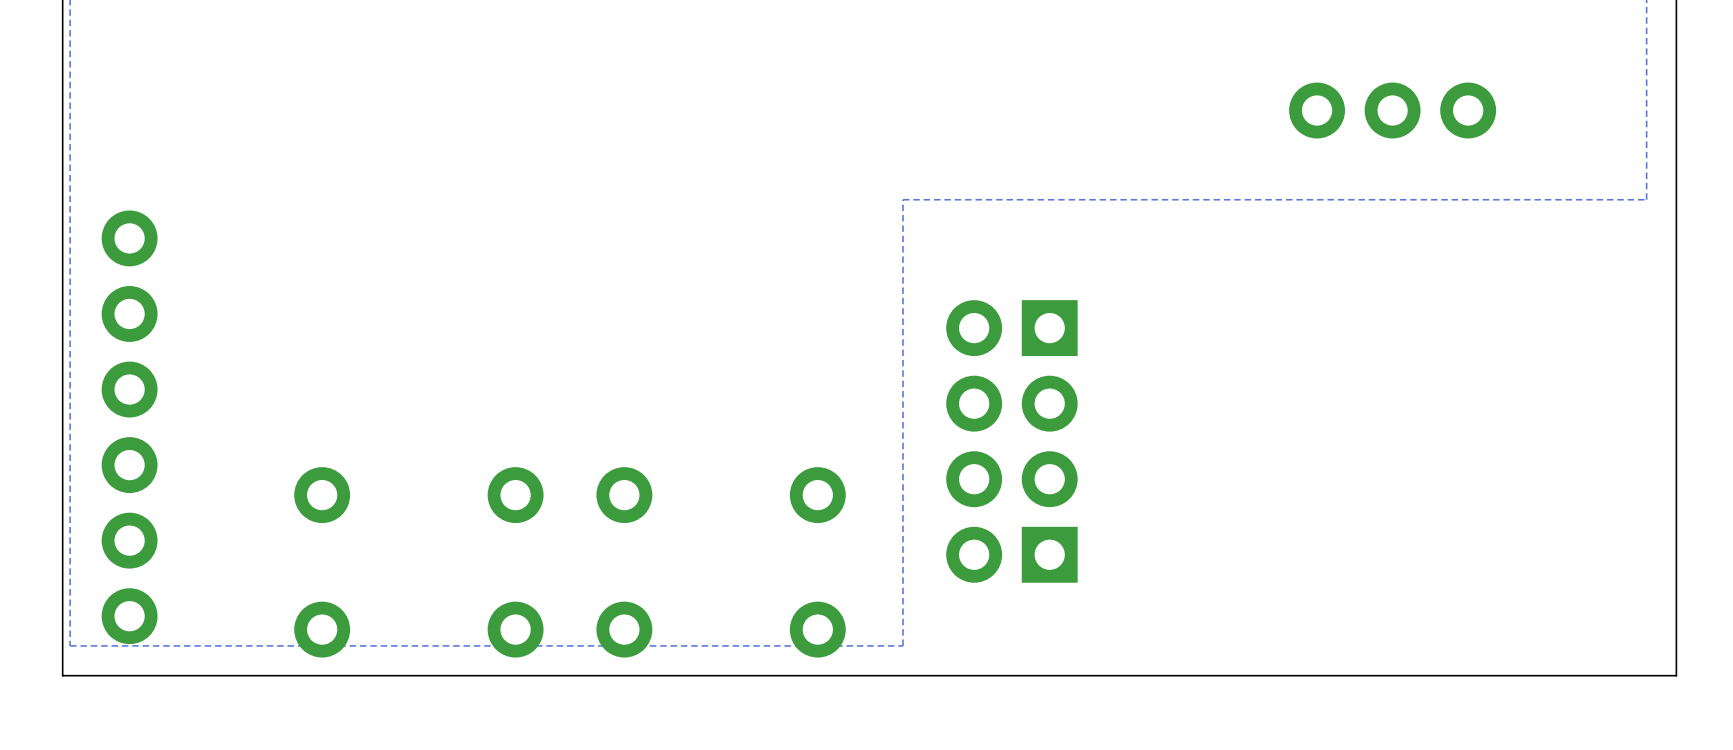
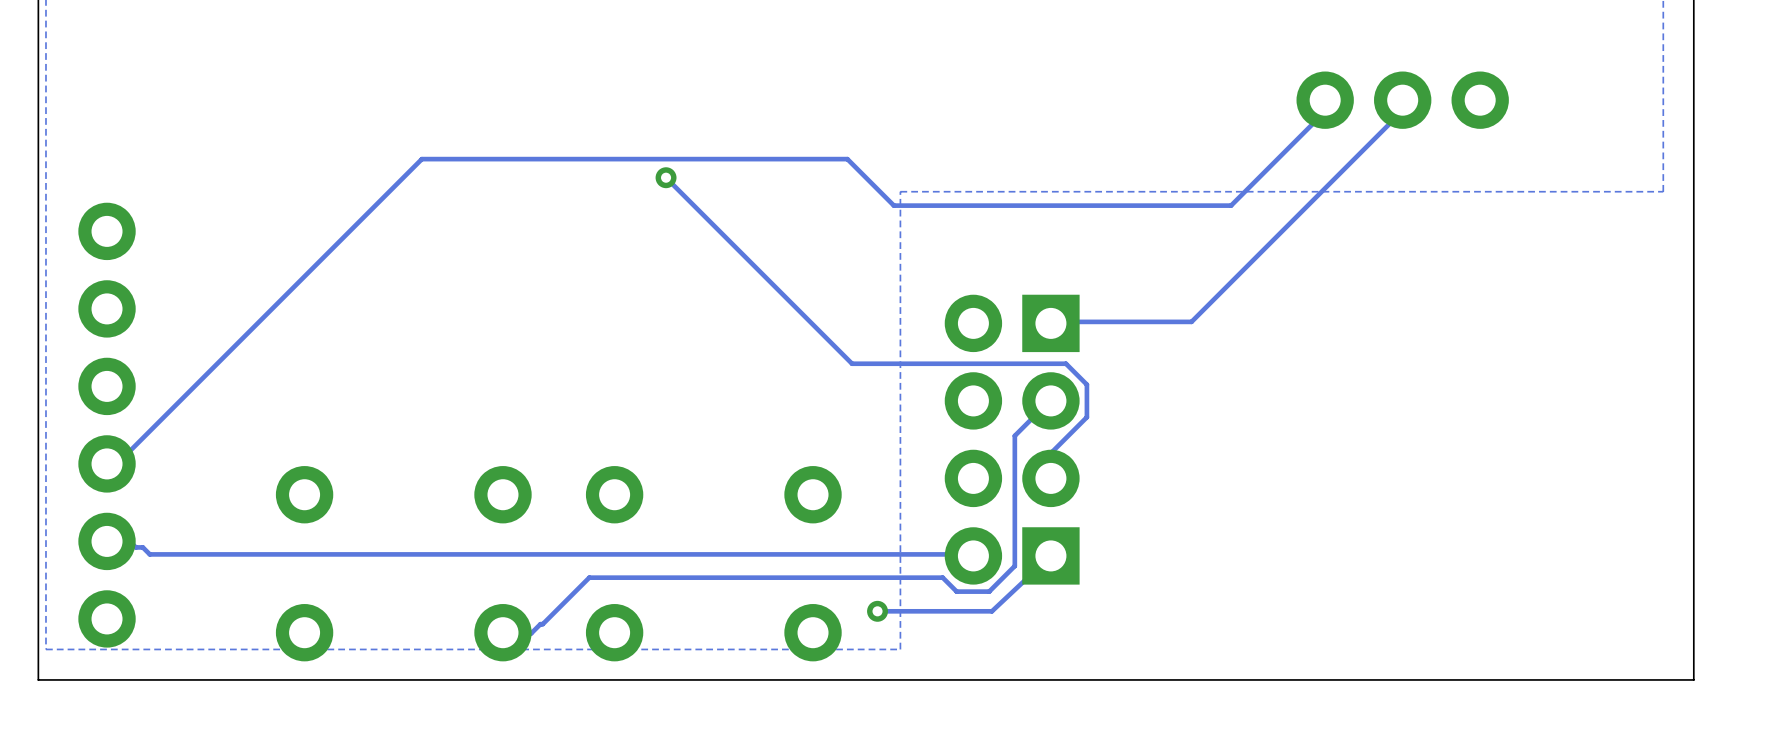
track: none -> (1325, 100) (1324, 112) (1231, 205) (893, 205) (847, 159) (421, 159) (117, 463) (107, 463)
track: none -> (1402, 100) (1400, 100) (1400, 112) (1191, 321) (1052, 321) (1050, 323)
track: none -> (666, 177) (852, 363) (1065, 363) (1086, 384) (1086, 417) (1052, 452) (1050, 478)
via: none -> (666, 177)
track: none -> (1050, 400) (1014, 435) (1014, 566) (989, 591) (956, 591) (942, 577) (589, 577) (531, 633) (502, 632)
track: none -> (107, 541) (131, 542) (135, 547) (142, 547) (149, 554) (972, 554) (973, 555)
track: none -> (1050, 555) (991, 611) (877, 611)
via: none -> (877, 611)

